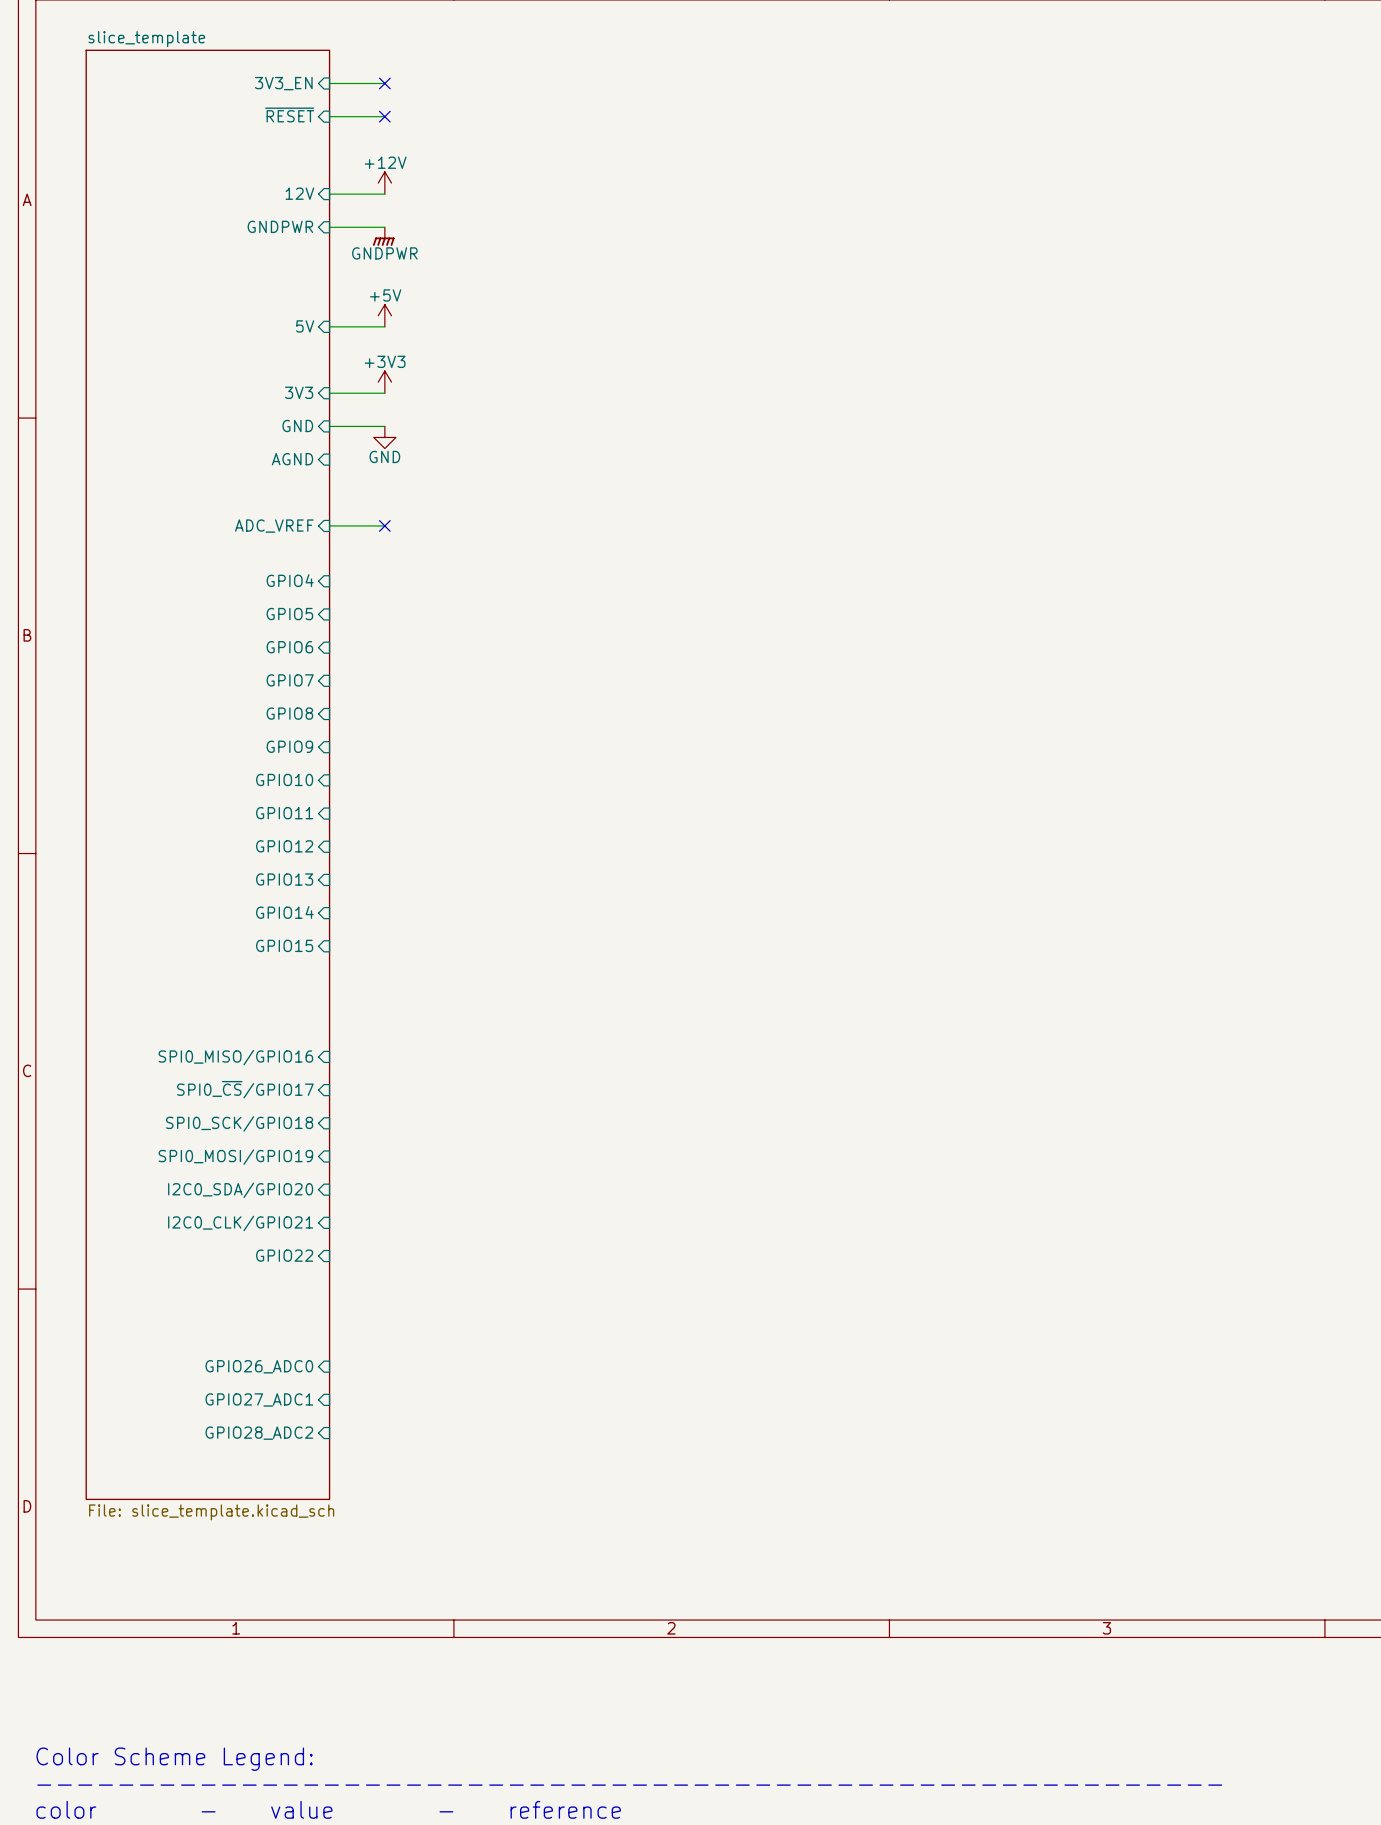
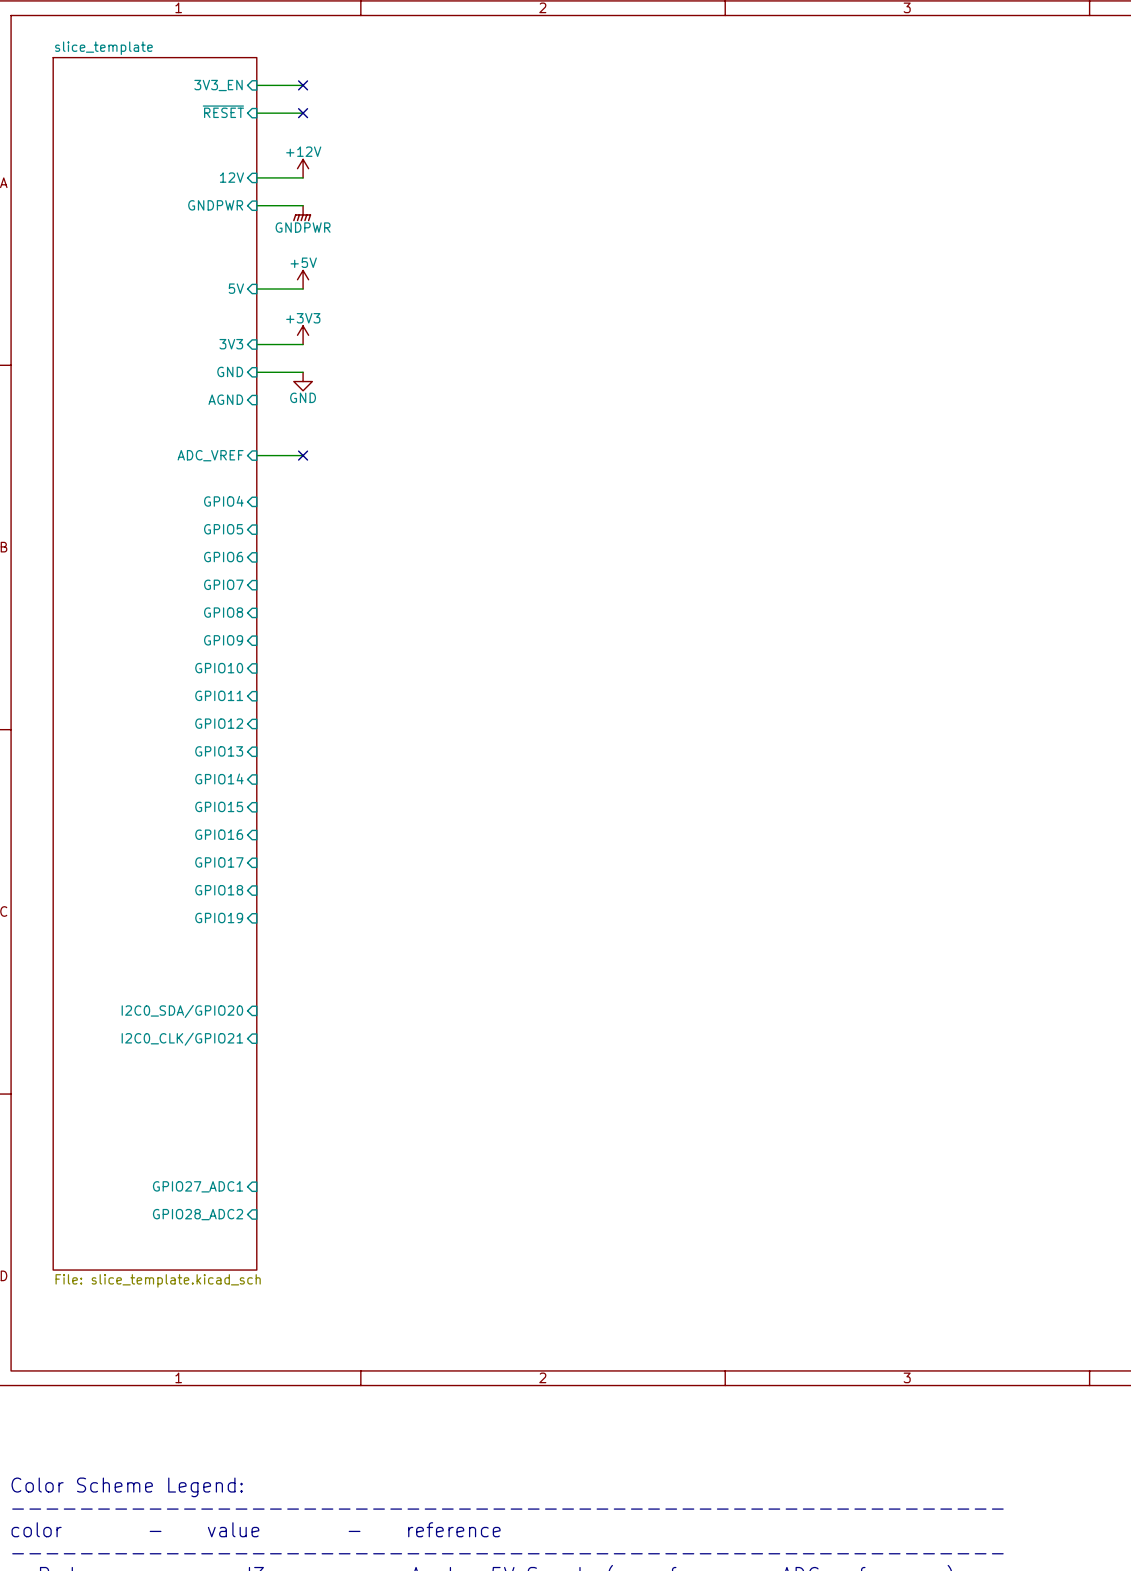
sheet pin: none -> GPIO16 (219, 834)
sheet pin: none -> GPIO17 (219, 862)
sheet pin: none -> GPIO18 (219, 890)
sheet pin: SPI0_MISO/GPIO16 (235, 1057) -> none
sheet pin: none -> GPIO19 (219, 917)
sheet pin: SPI0_~{CS}/GPIO17 (245, 1089) -> none
sheet pin: SPI0_SCK/GPIO18 (239, 1123) -> none
sheet pin: SPI0_MOSI/GPIO19 (235, 1157) -> none
sheet pin: GPIO22 (284, 1255) -> none
sheet pin: GPIO26_ADC0 (259, 1366) -> none

